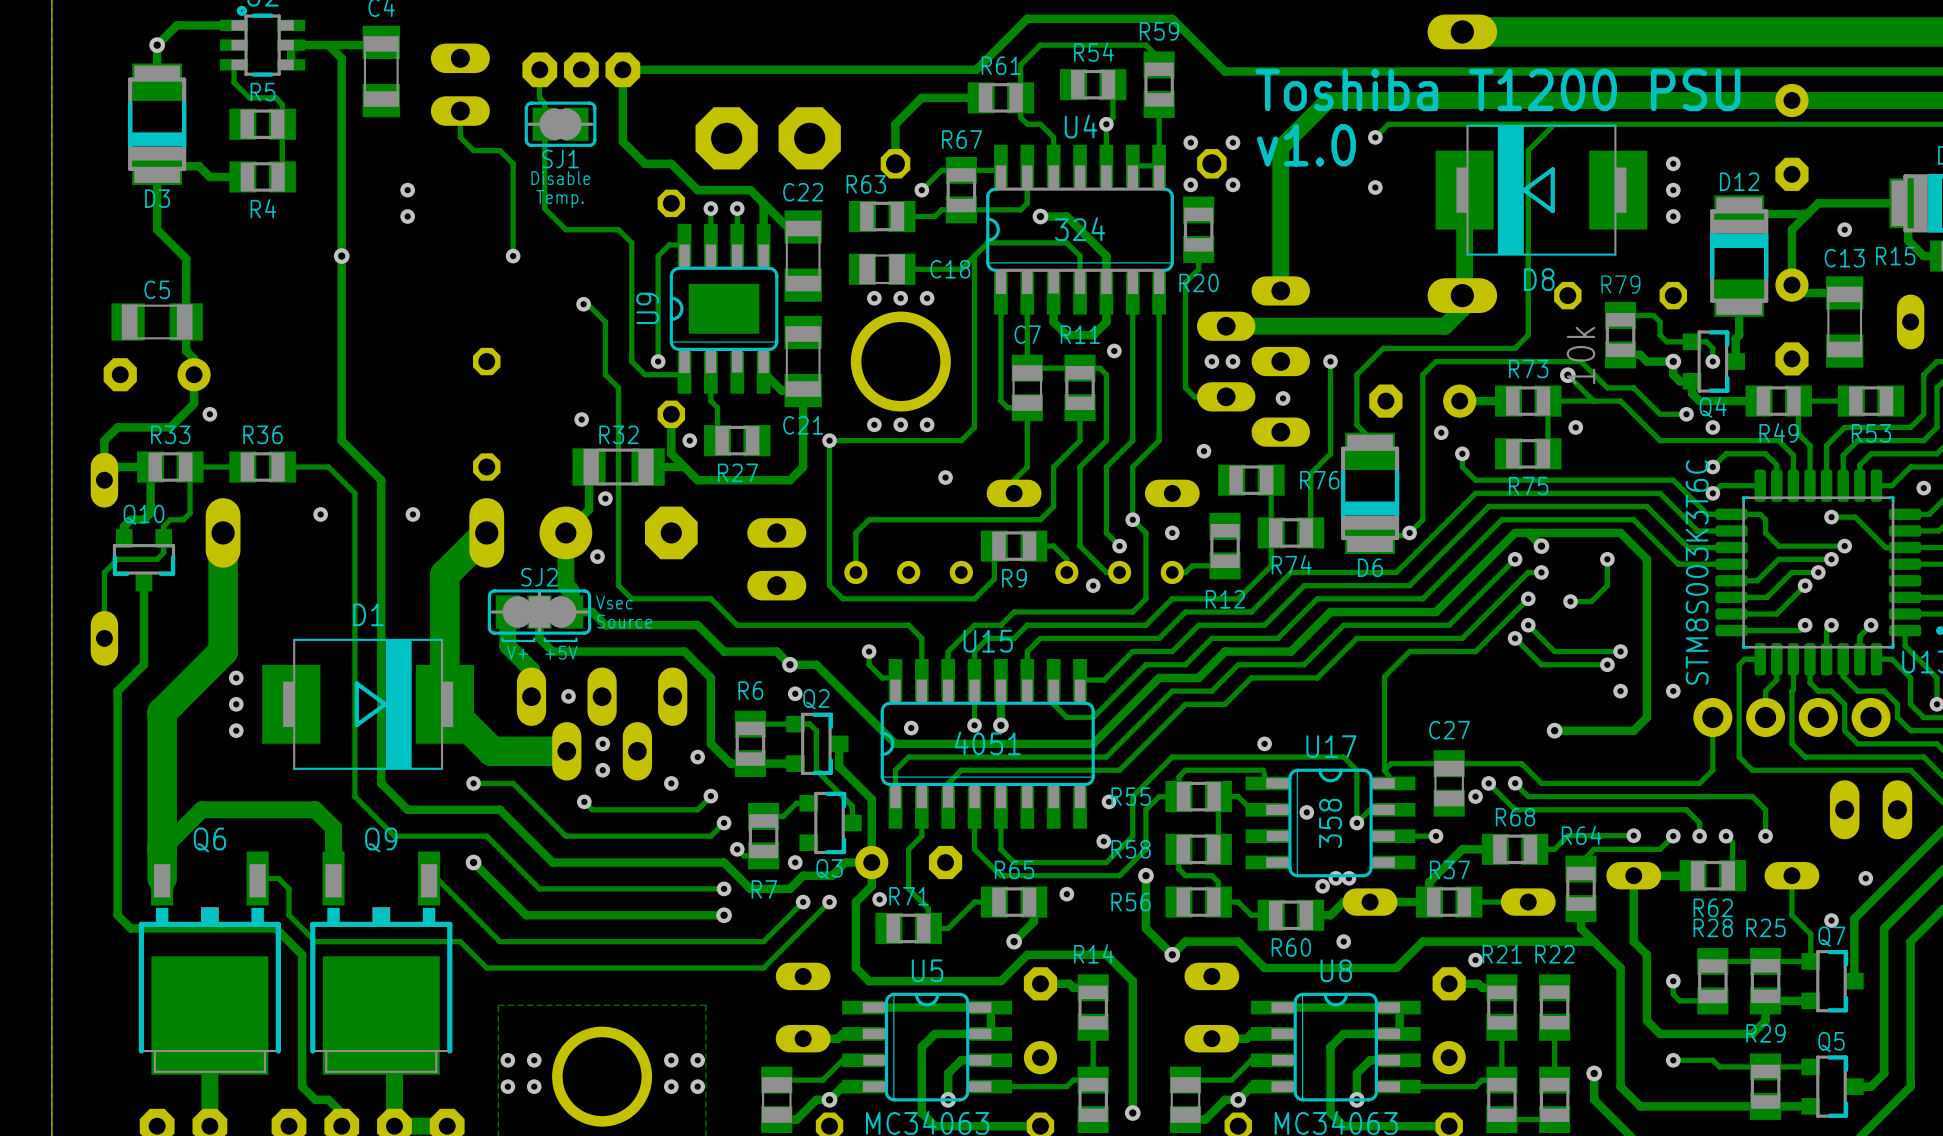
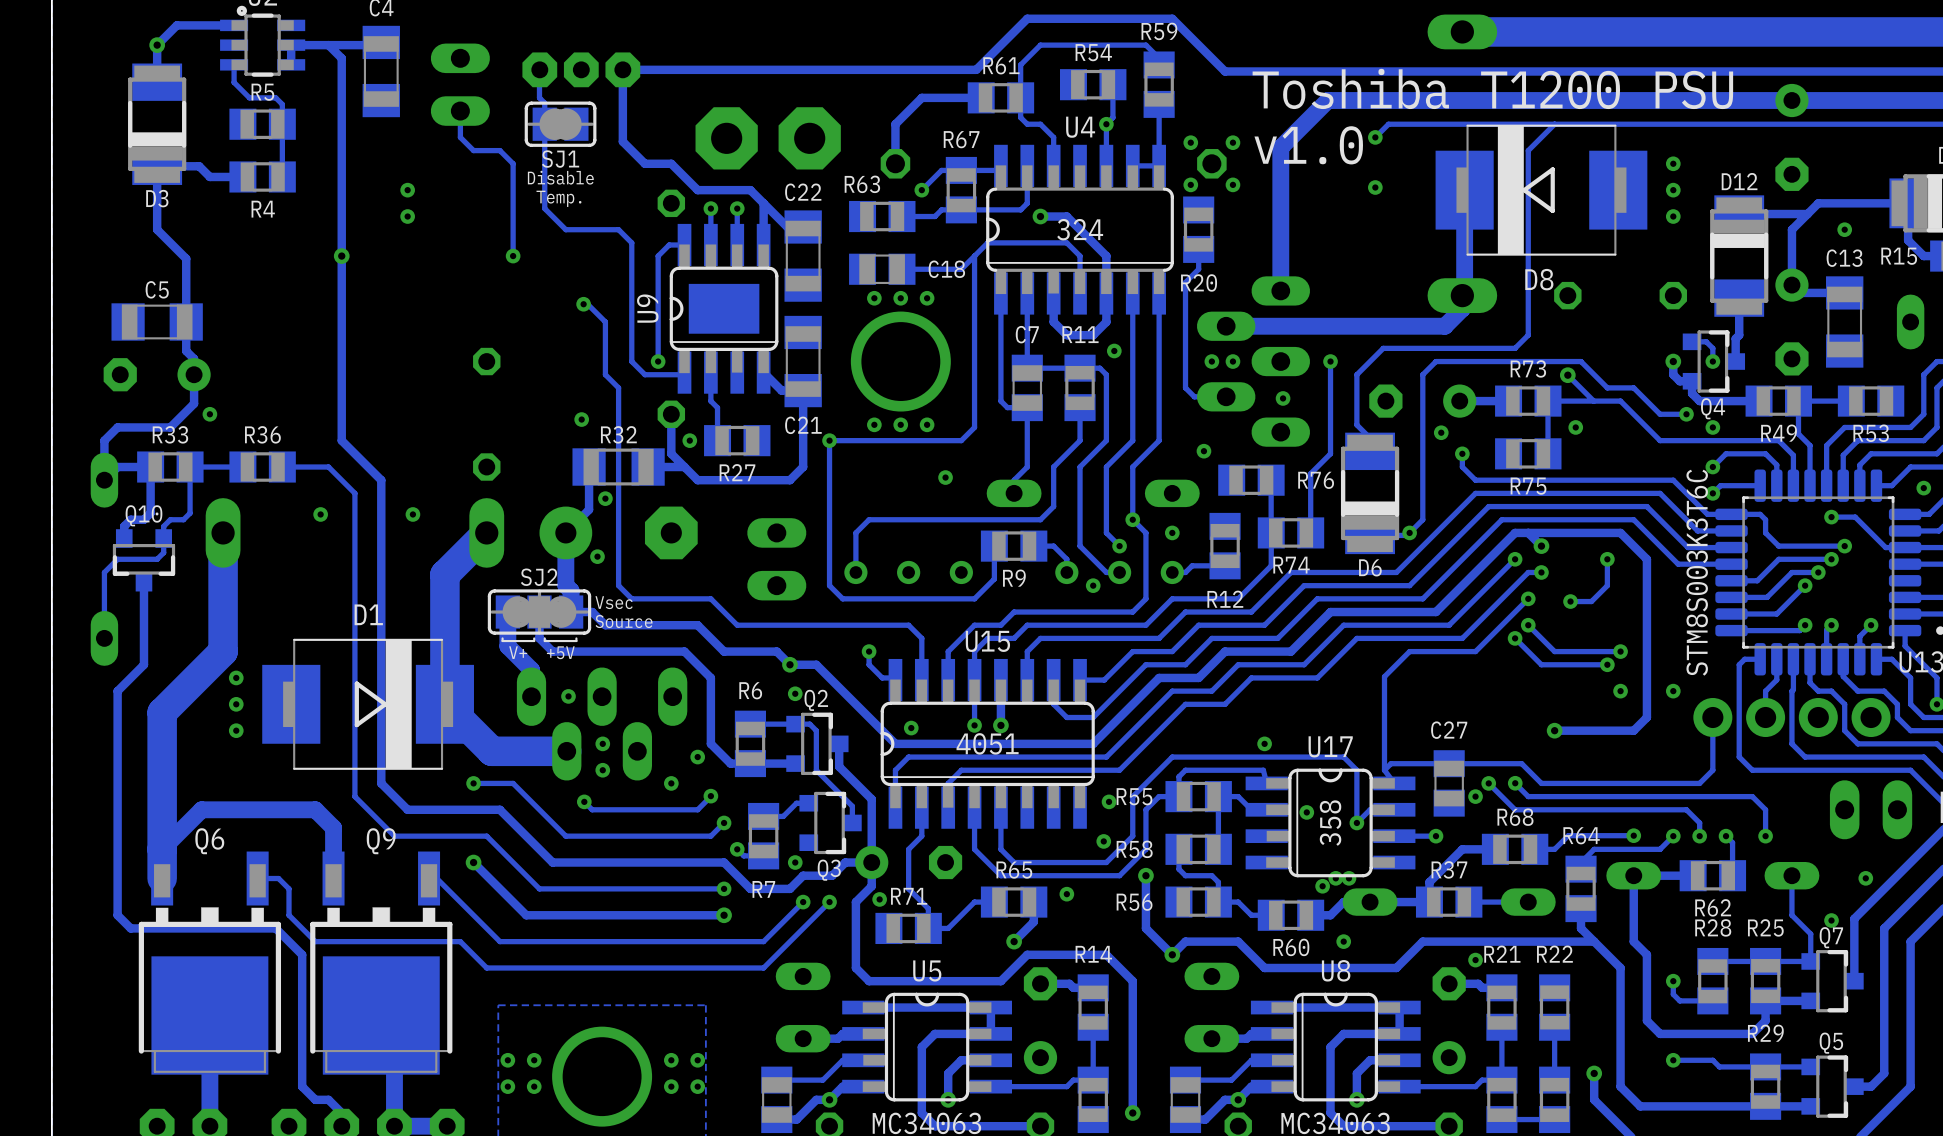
track: (1620, 315) (1653, 315) (1660, 321) (1660, 335) (1666, 341) (1692, 341) -> none
R79: 10k (1620, 335) -> none
track: (1620, 354) (1640, 354) (1646, 361) (1673, 361) -> none

